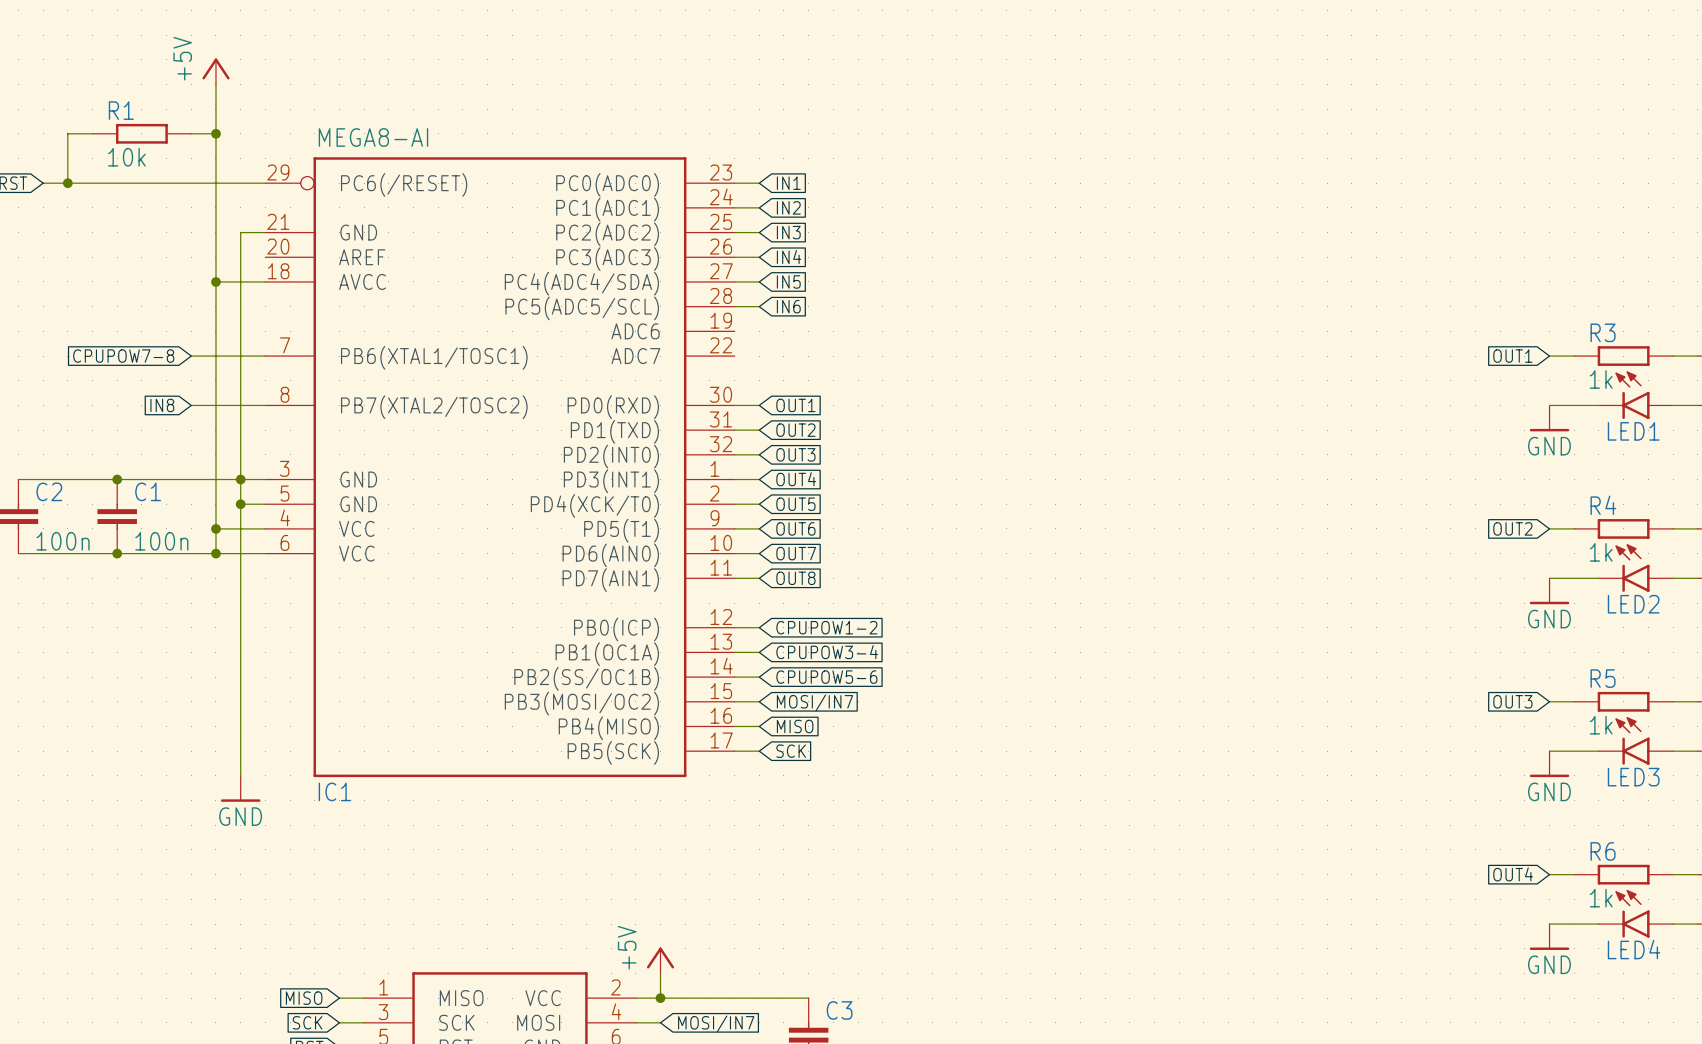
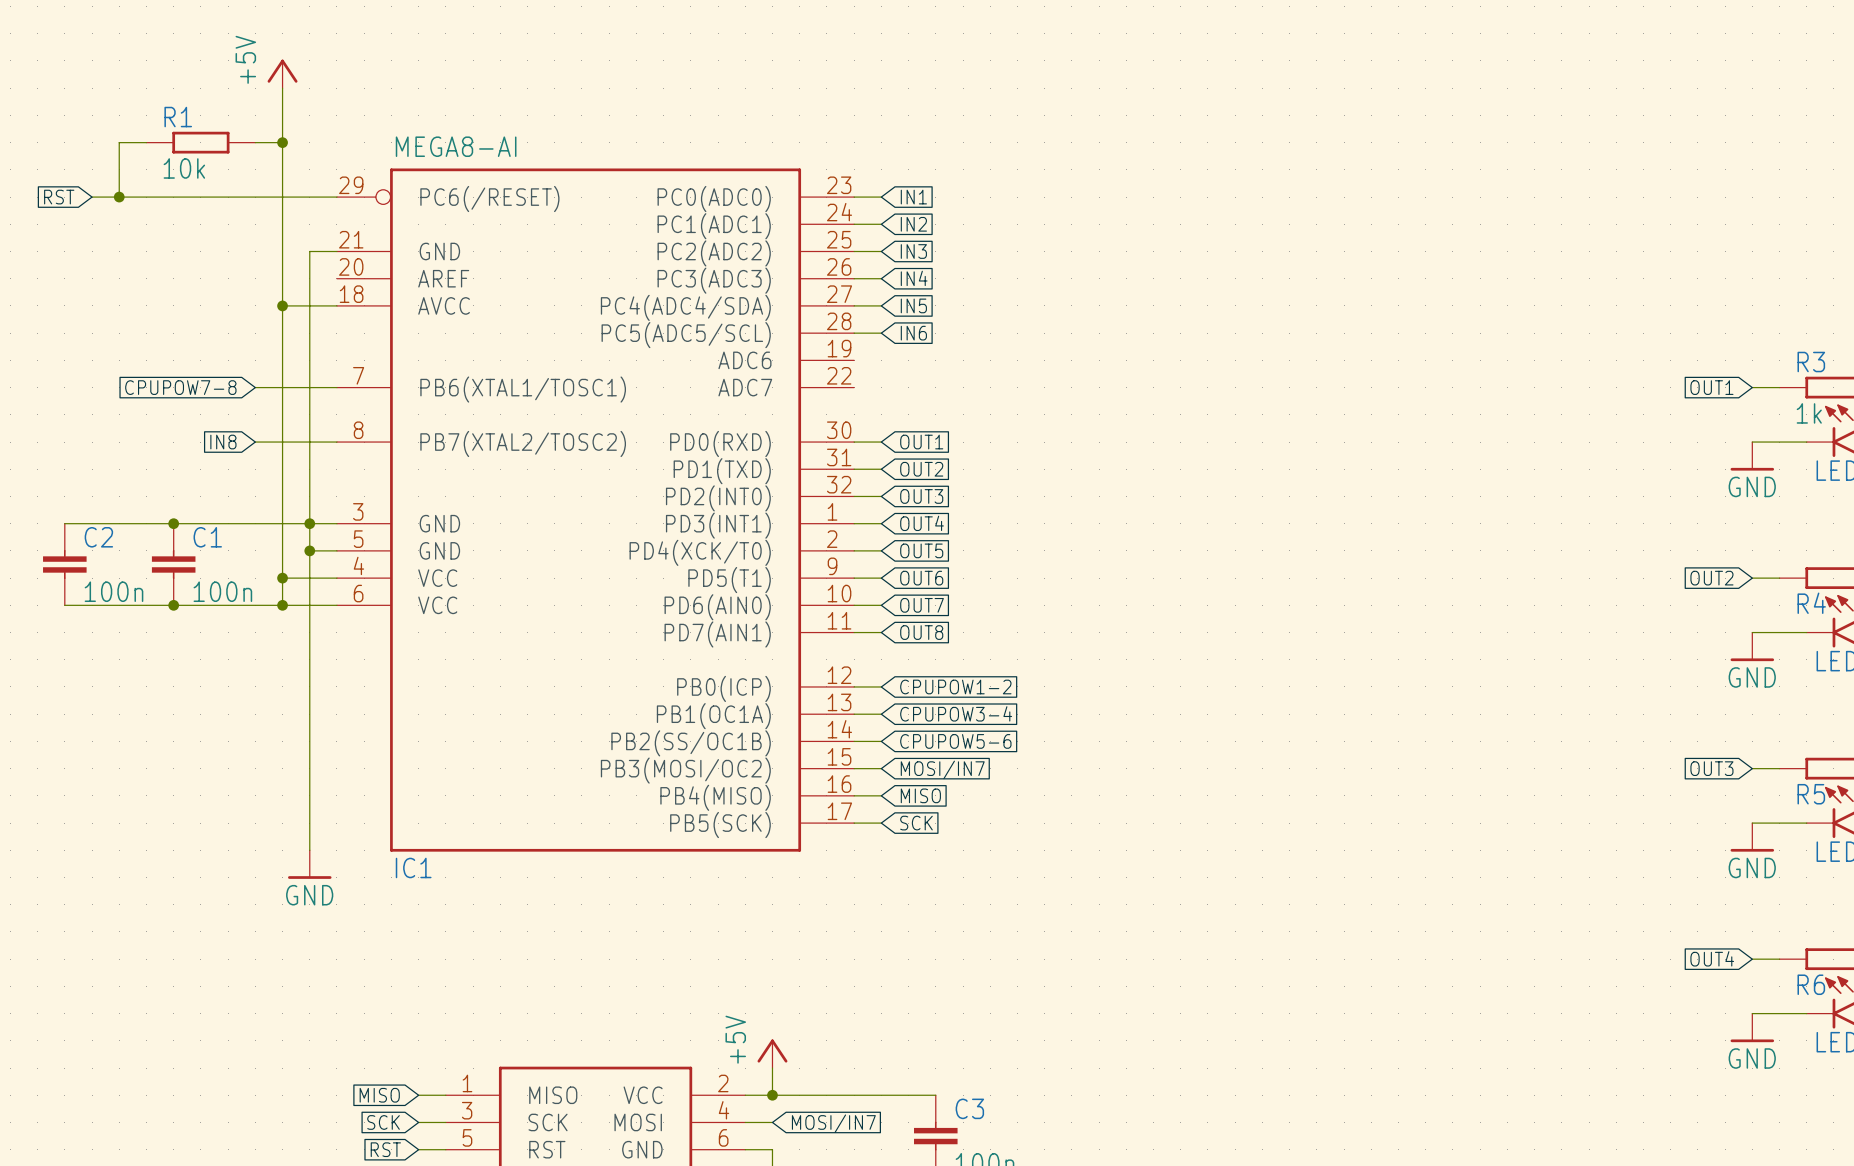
R4 name position: R4 (1603, 505) -> R4 (1811, 603)
R4 value: 1k (1601, 552) -> none
R5 name position: R5 (1603, 678) -> R5 (1811, 794)
R5 value: 1k (1601, 725) -> none
R6 name position: R6 (1603, 851) -> R6 (1811, 984)
R6 value: 1k (1601, 898) -> none

